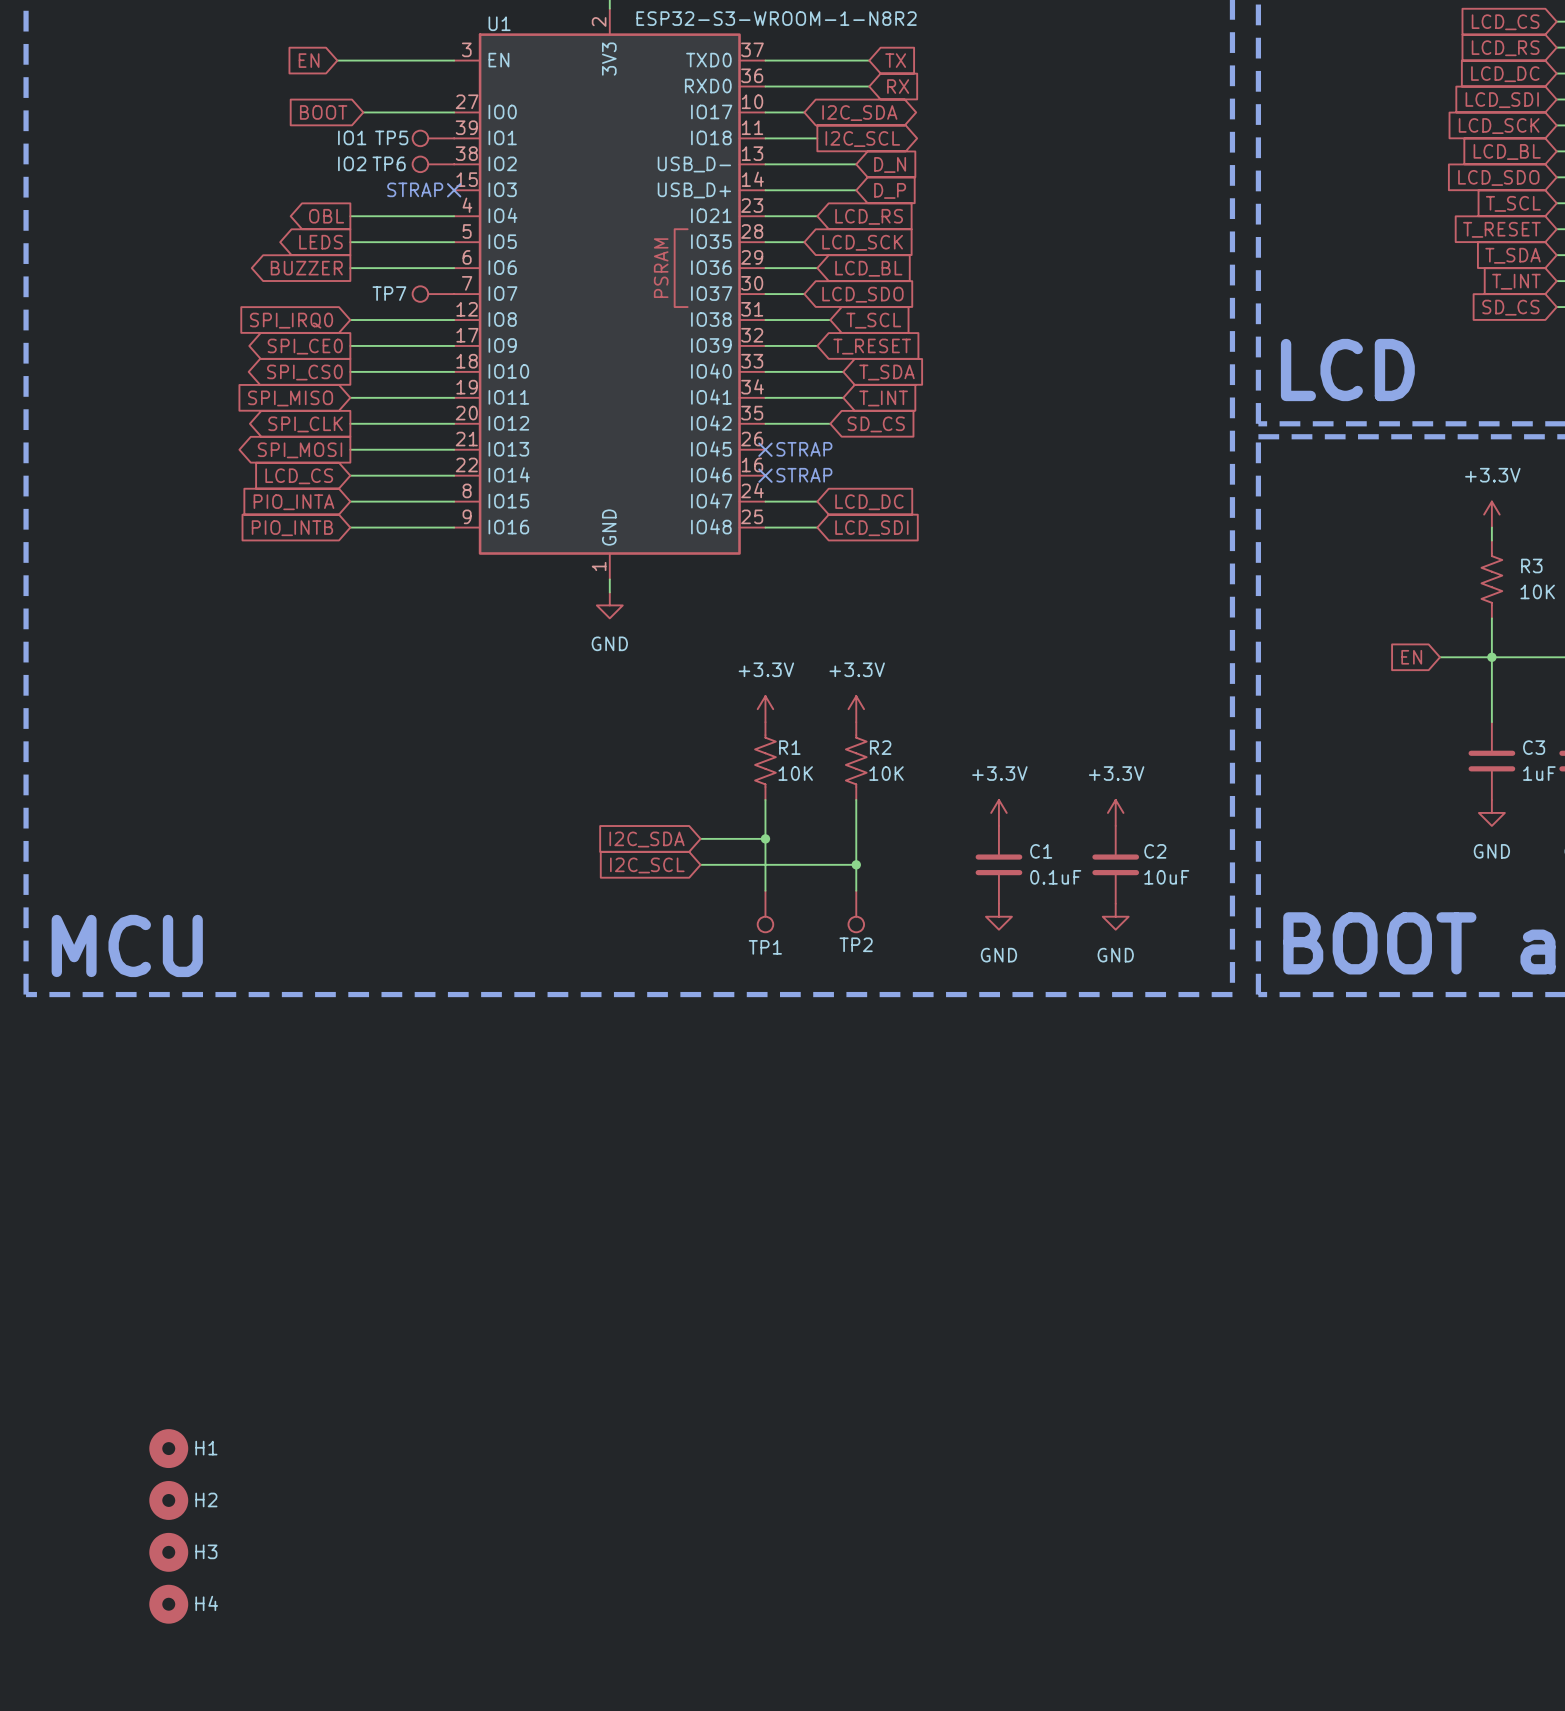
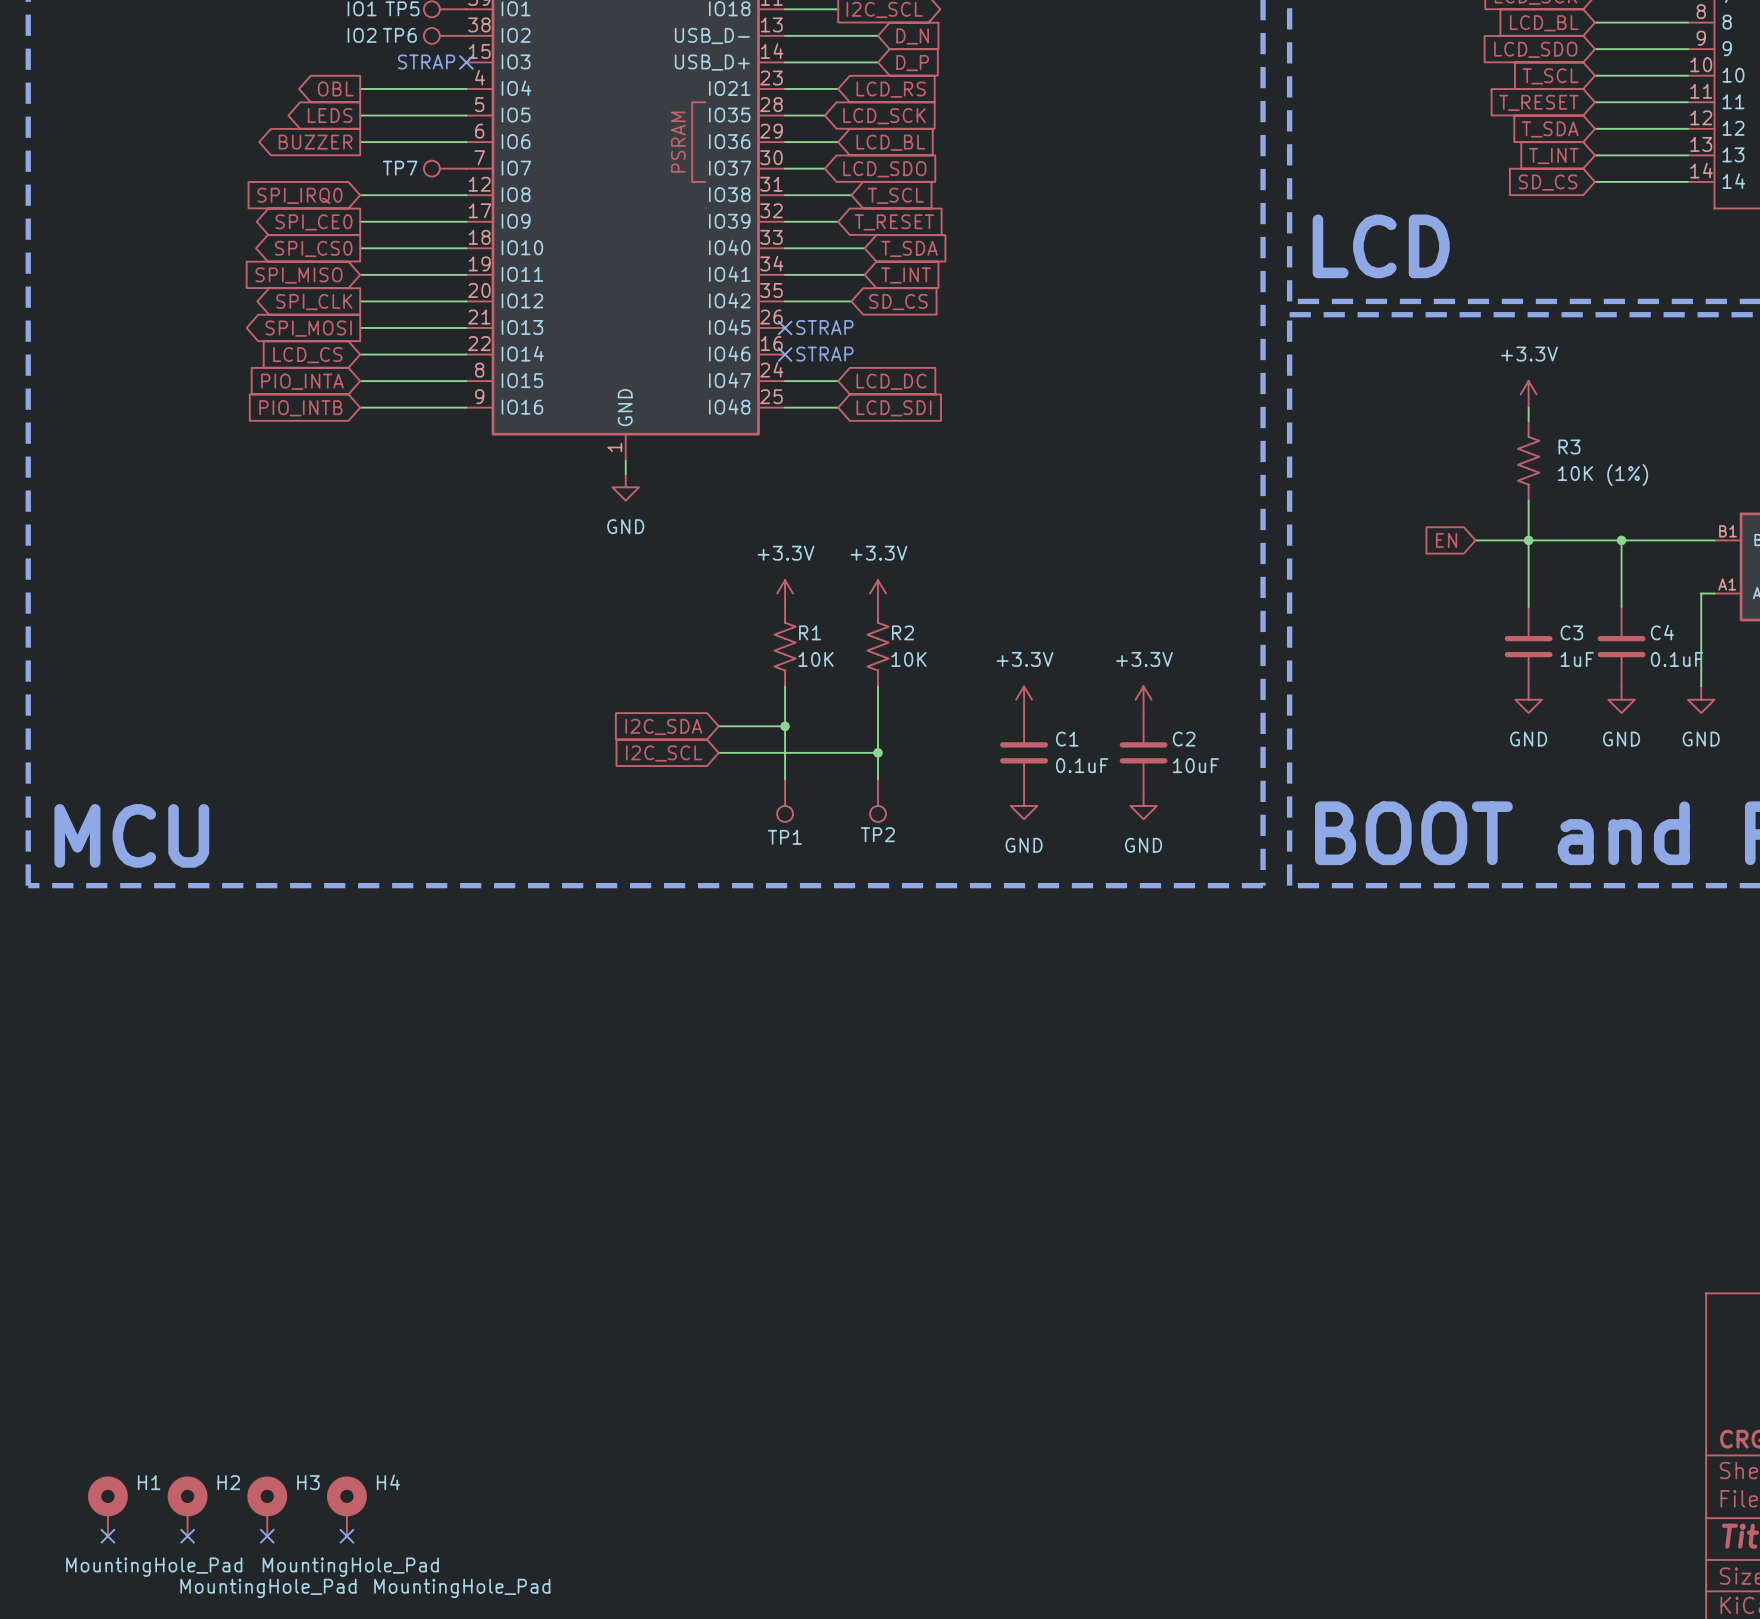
H1 symbol: [149, 1429, 189, 1469] -> [88, 1476, 128, 1537]
H1 name position: H1 (206, 1448) -> H1 (149, 1482)
H2 symbol: [149, 1481, 189, 1520] -> [167, 1476, 208, 1537]
H2 name position: H2 (206, 1499) -> H2 (228, 1482)
H3 symbol: [149, 1532, 189, 1572] -> [247, 1476, 288, 1537]
H3 name position: H3 (206, 1551) -> H3 (308, 1482)
H4 symbol: [149, 1584, 189, 1624] -> [327, 1476, 367, 1537]
H4 name position: H4 (206, 1603) -> H4 (388, 1482)
no-connect mark: none -> (107, 1536)
no-connect mark: none -> (187, 1536)
no-connect mark: none -> (267, 1536)
no-connect mark: none -> (346, 1536)
H1 value: none -> MountingHole_Pad (154, 1567)
H3 value: none -> MountingHole_Pad (350, 1567)
H2 value: none -> MountingHole_Pad (268, 1588)
H4 value: none -> MountingHole_Pad (462, 1588)

